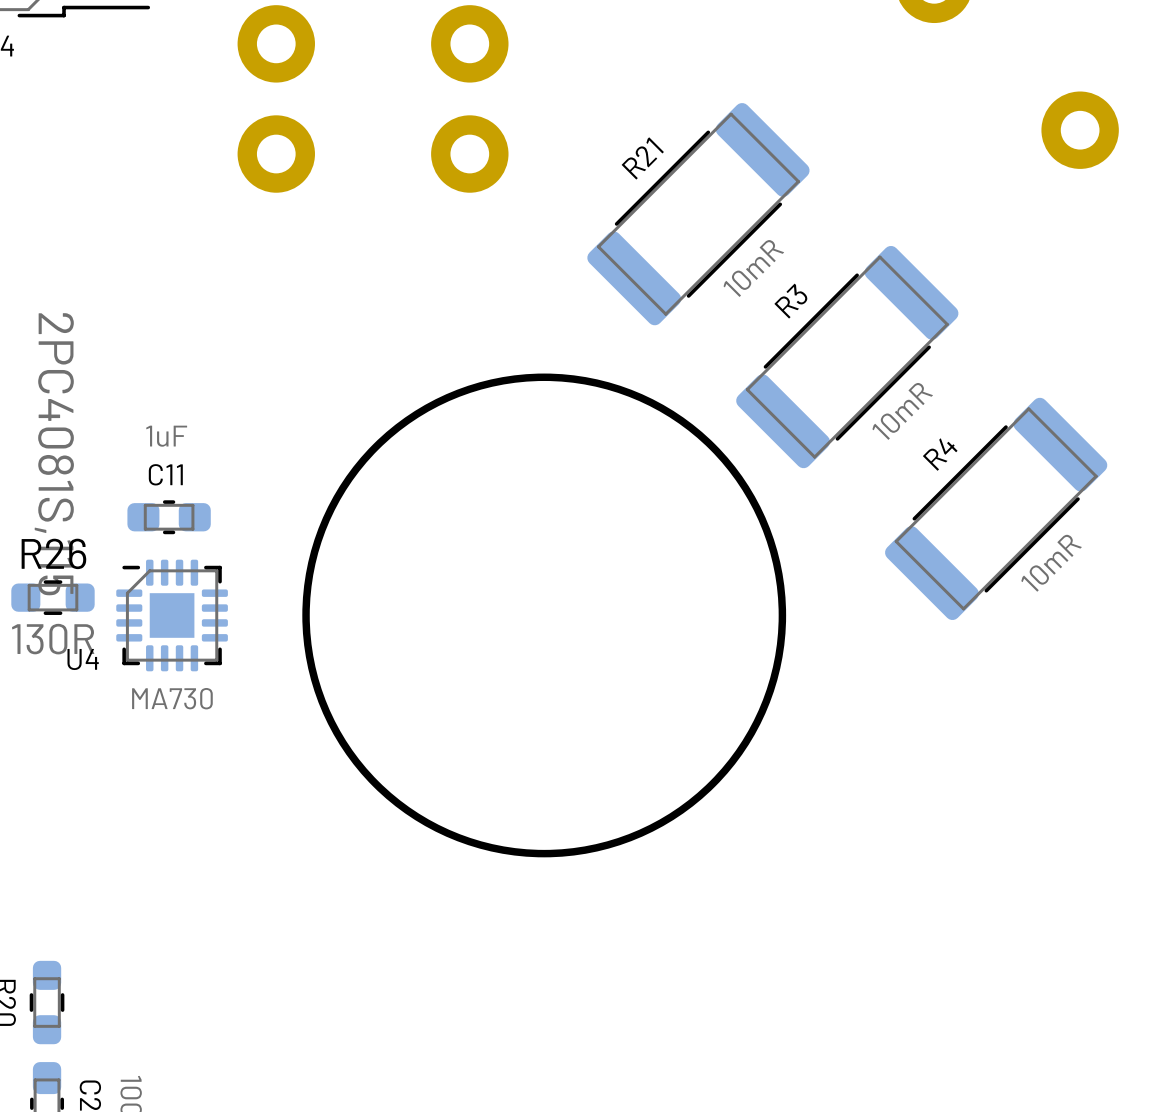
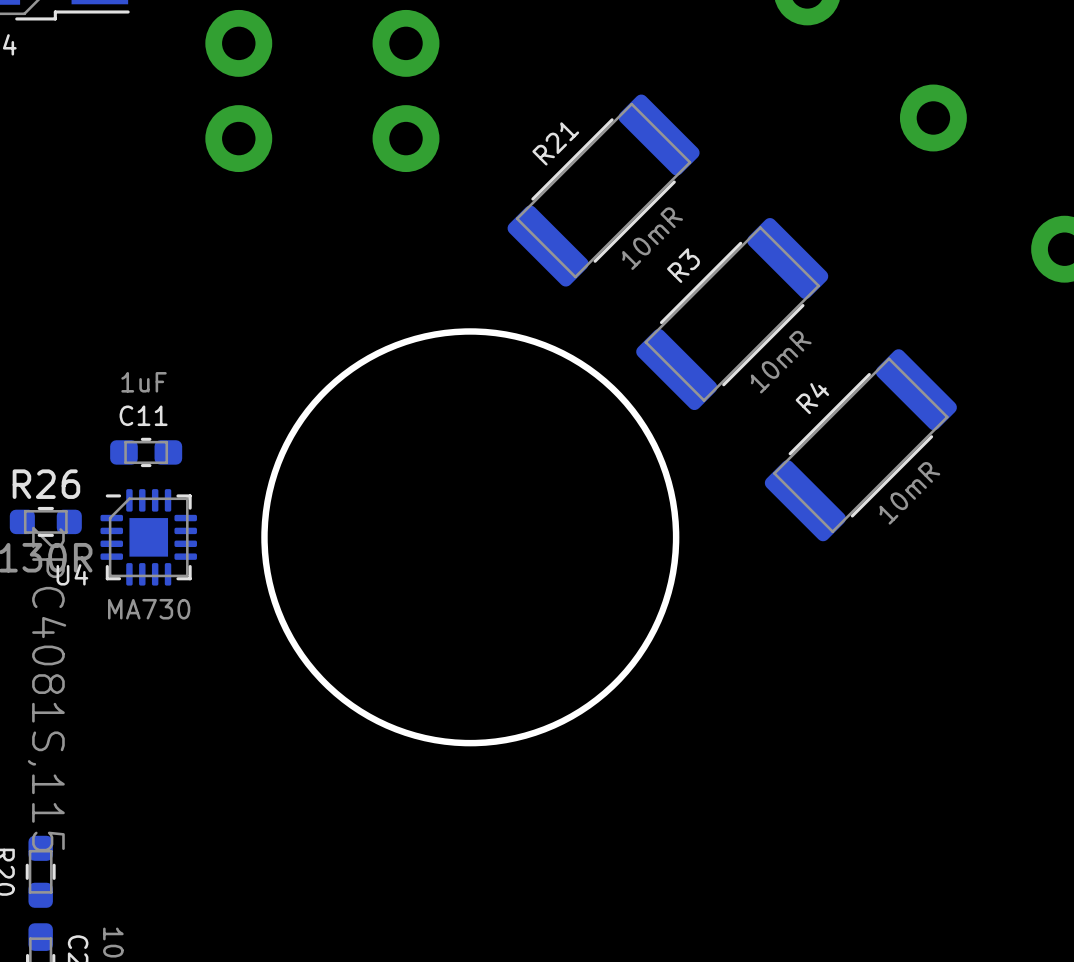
part value position: 2PC4081S,115 (54, 454) -> 2PC4081S,115 (47, 689)

